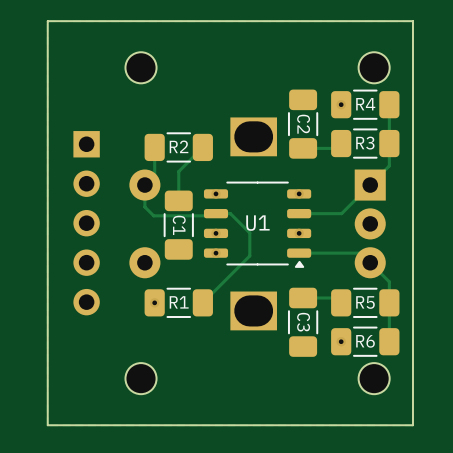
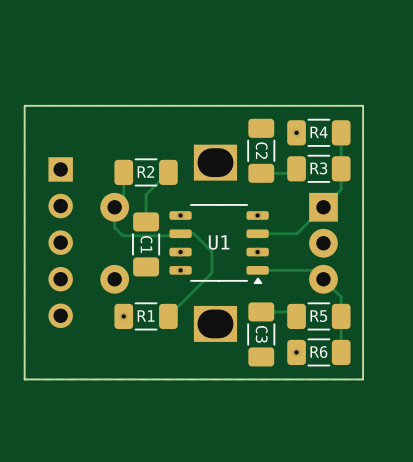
part: (141, 67) -> none
part: (374, 67) -> none
board edge: (412, 75) (412, 21) (47, 21) (47, 75) -> (363, 105) (24, 105)
board edge: (412, 370) (412, 425) (47, 425) (47, 370) -> (363, 379) (24, 379)
part: (141, 378) -> none
part: (374, 378) -> none

